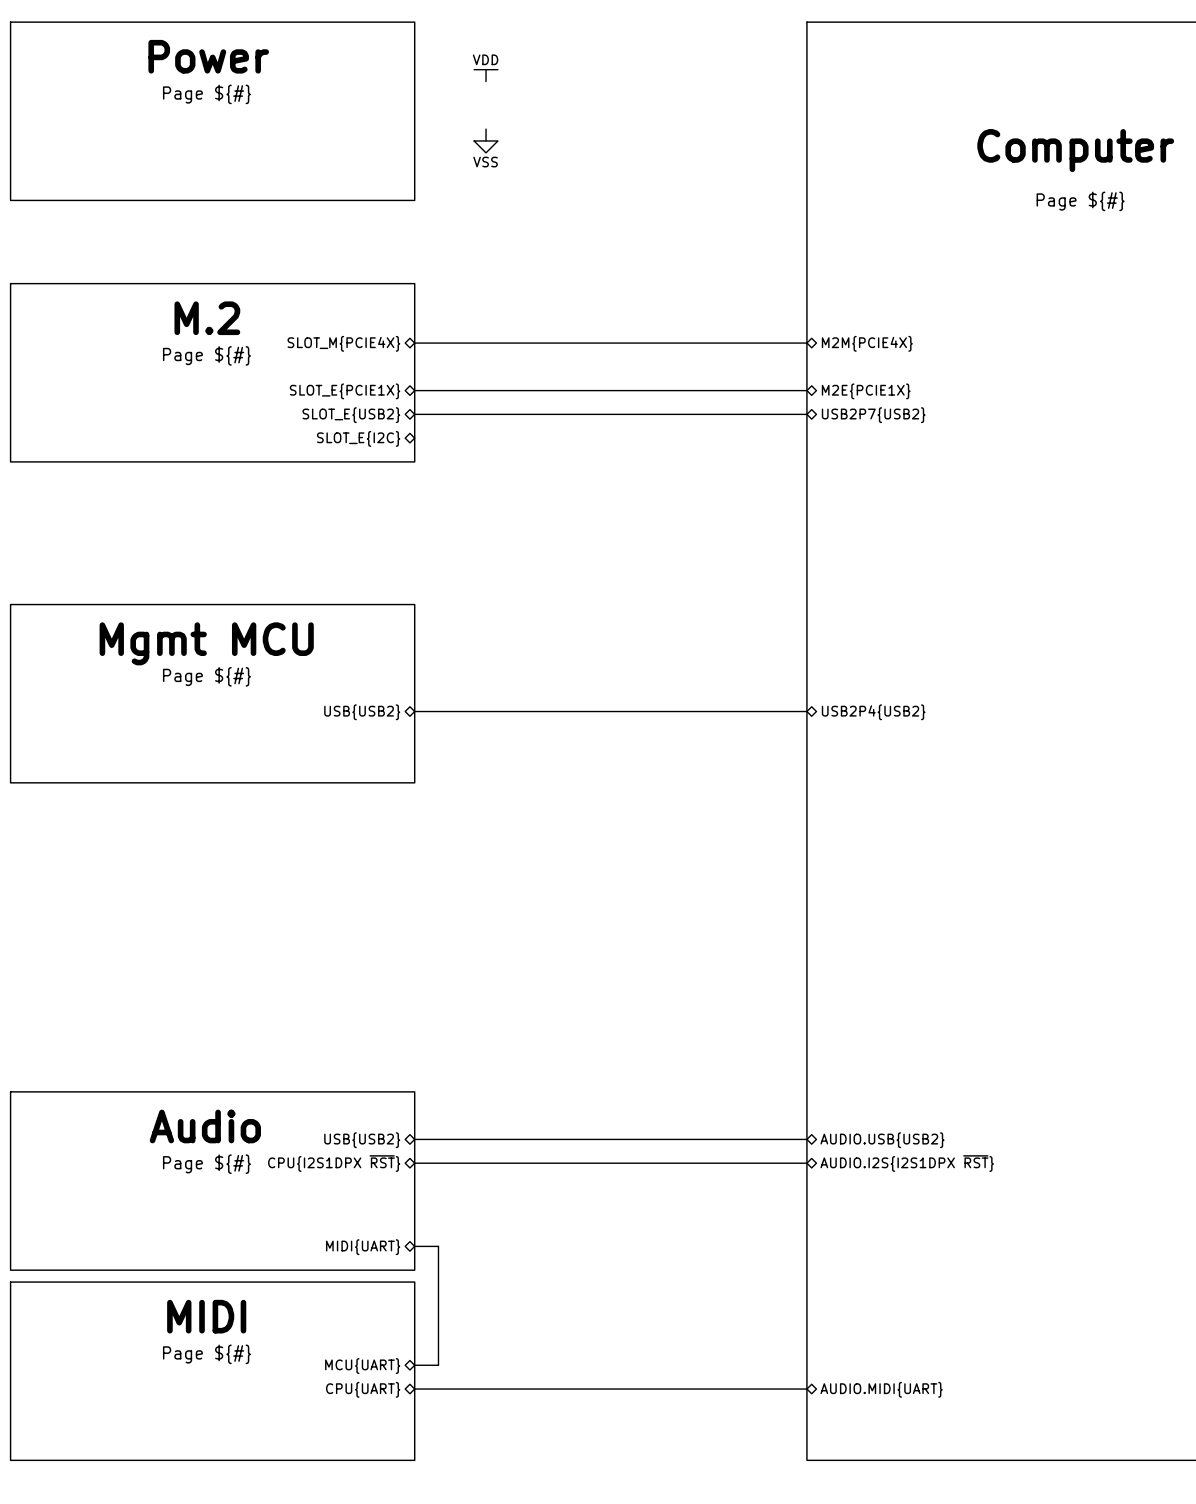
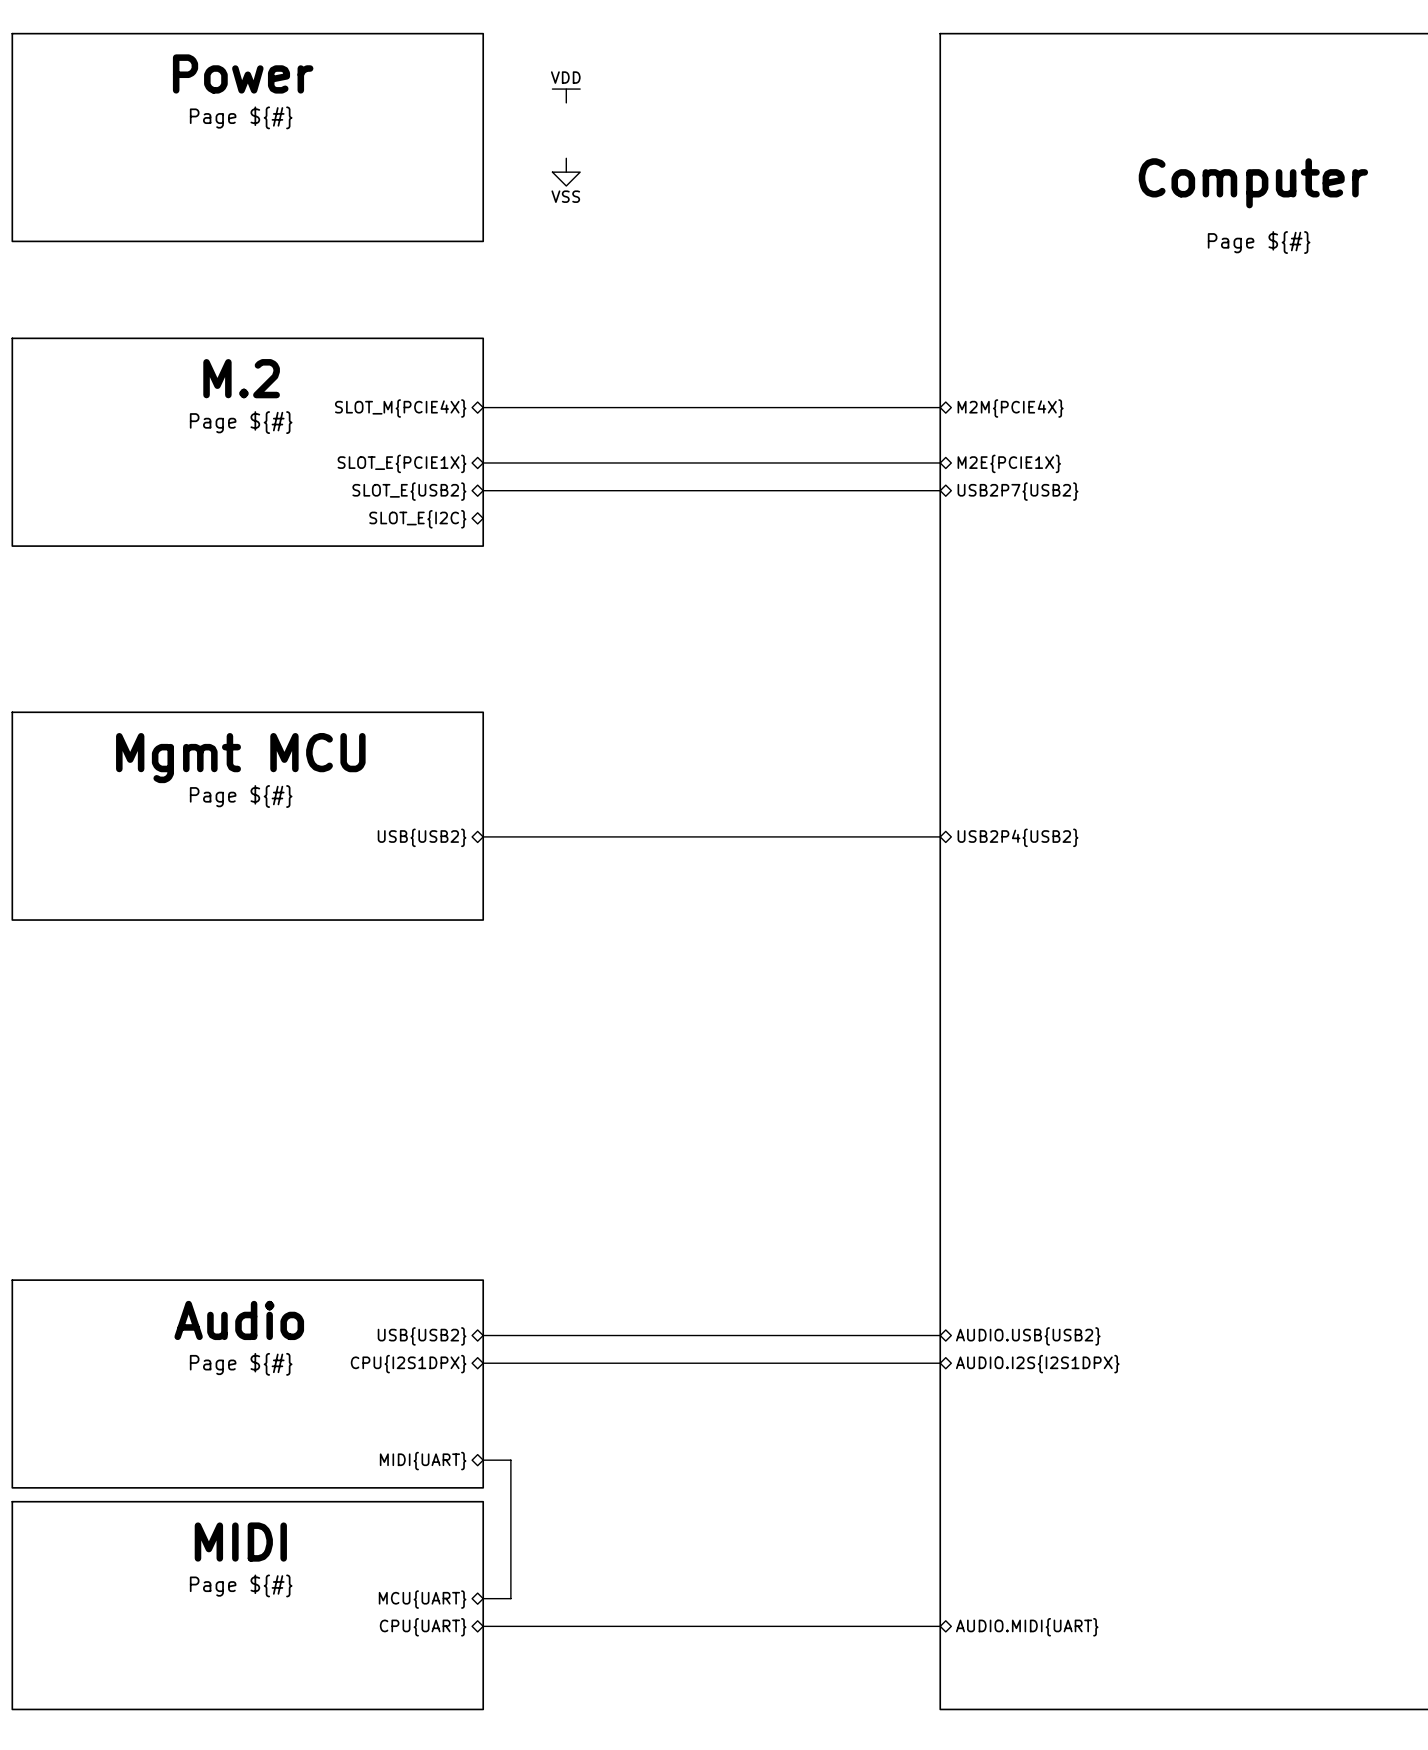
sheet pin: CPU{I2S1DPX ~{RST}} (334, 1163) -> CPU{I2S1DPX} (408, 1364)
sheet pin: AUDIO.I2S{I2S1DPX ~{RST}} (907, 1163) -> AUDIO.I2S{I2S1DPX} (1037, 1364)

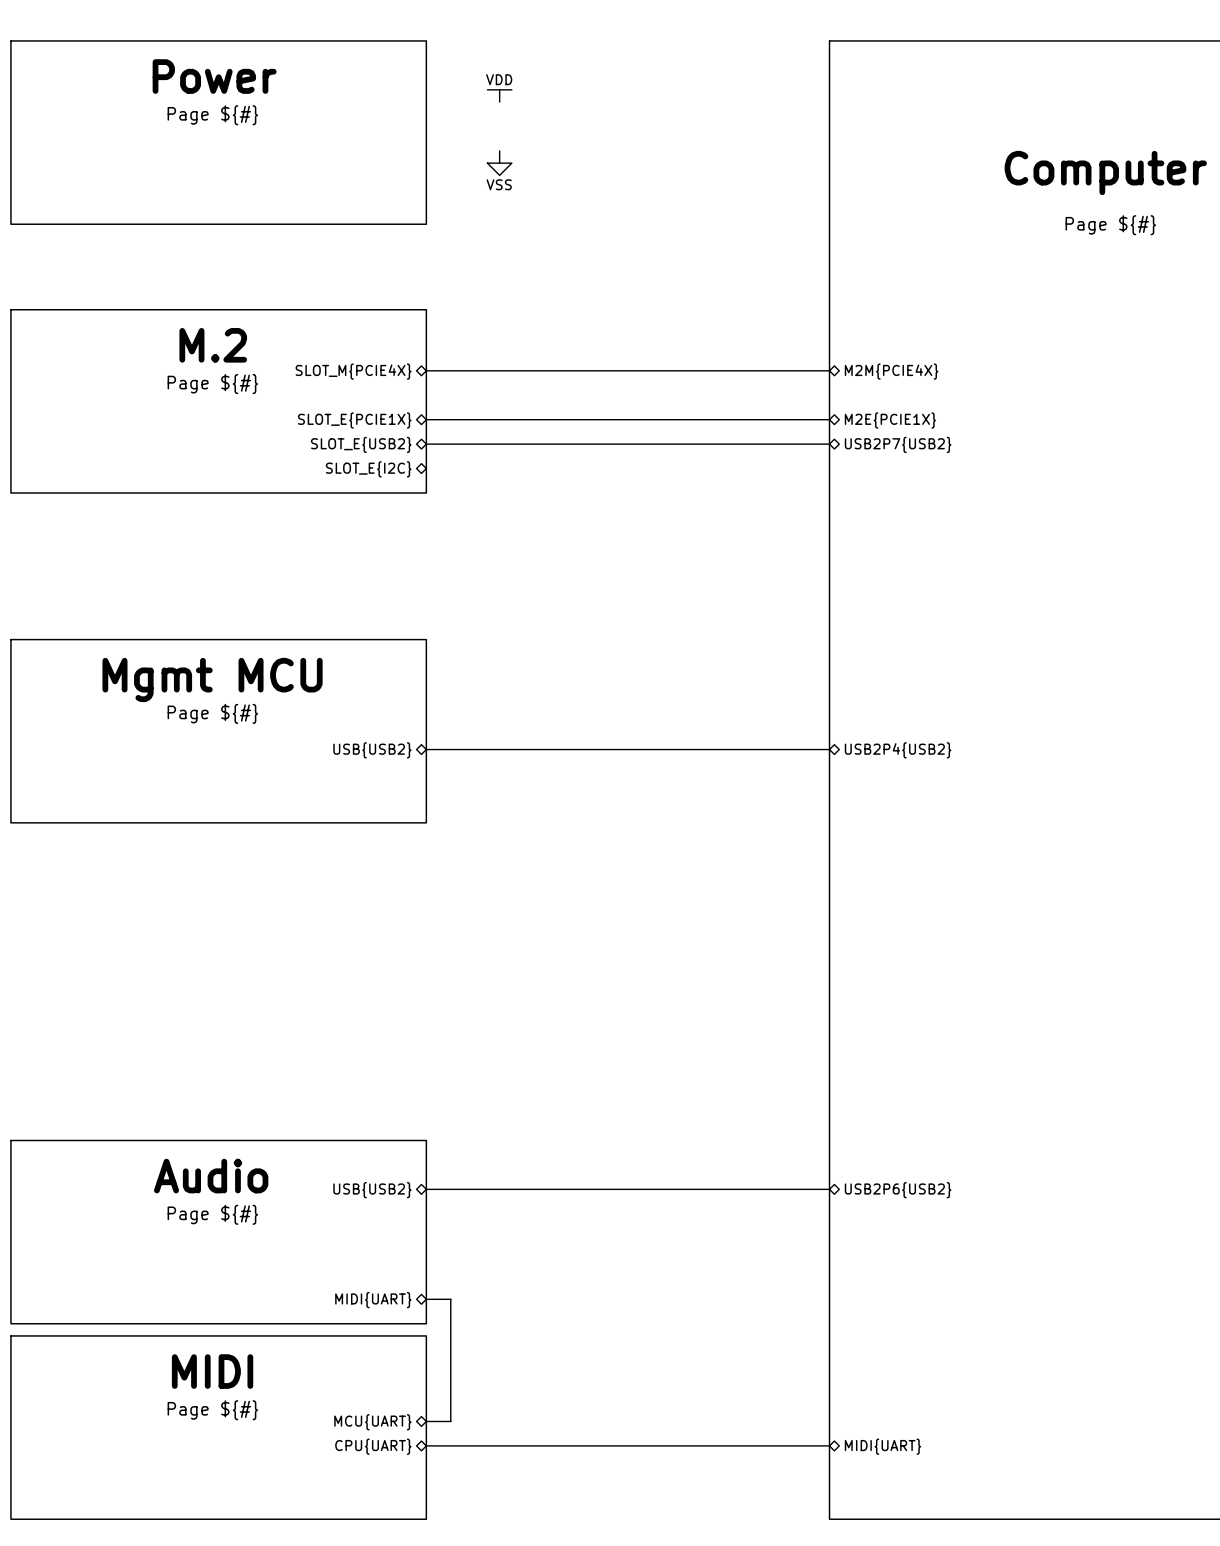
sheet pin: AUDIO.USB{USB2} (1028, 1336) -> USB2P6{USB2} (898, 1190)
bus: (483, 1363) (940, 1363) -> none
sheet pin: CPU{I2S1DPX} (408, 1364) -> none
sheet pin: AUDIO.I2S{I2S1DPX} (1037, 1364) -> none
sheet pin: AUDIO.MIDI{UART} (1027, 1627) -> MIDI{UART} (882, 1446)

